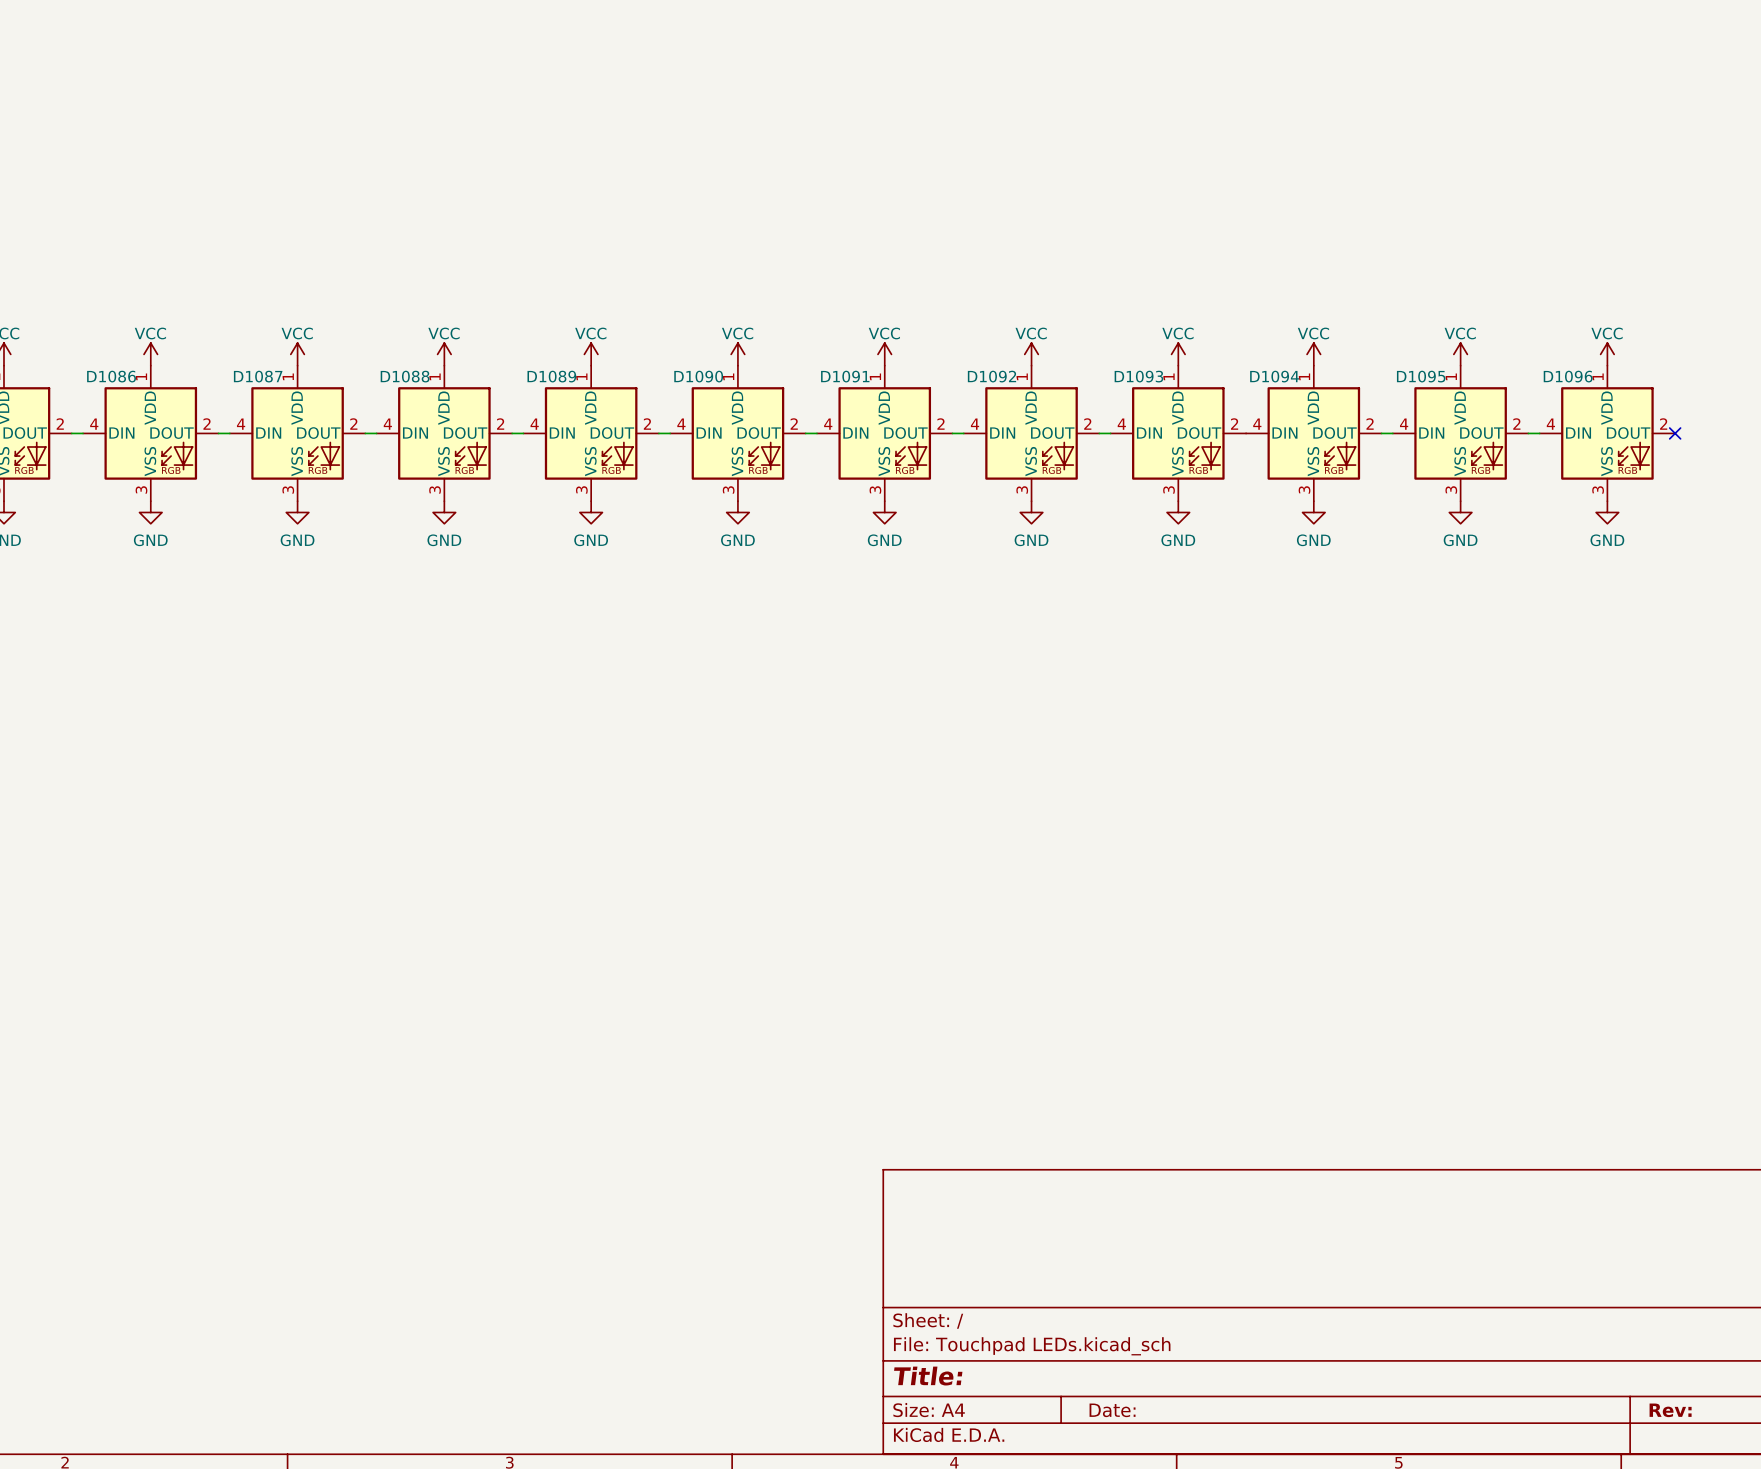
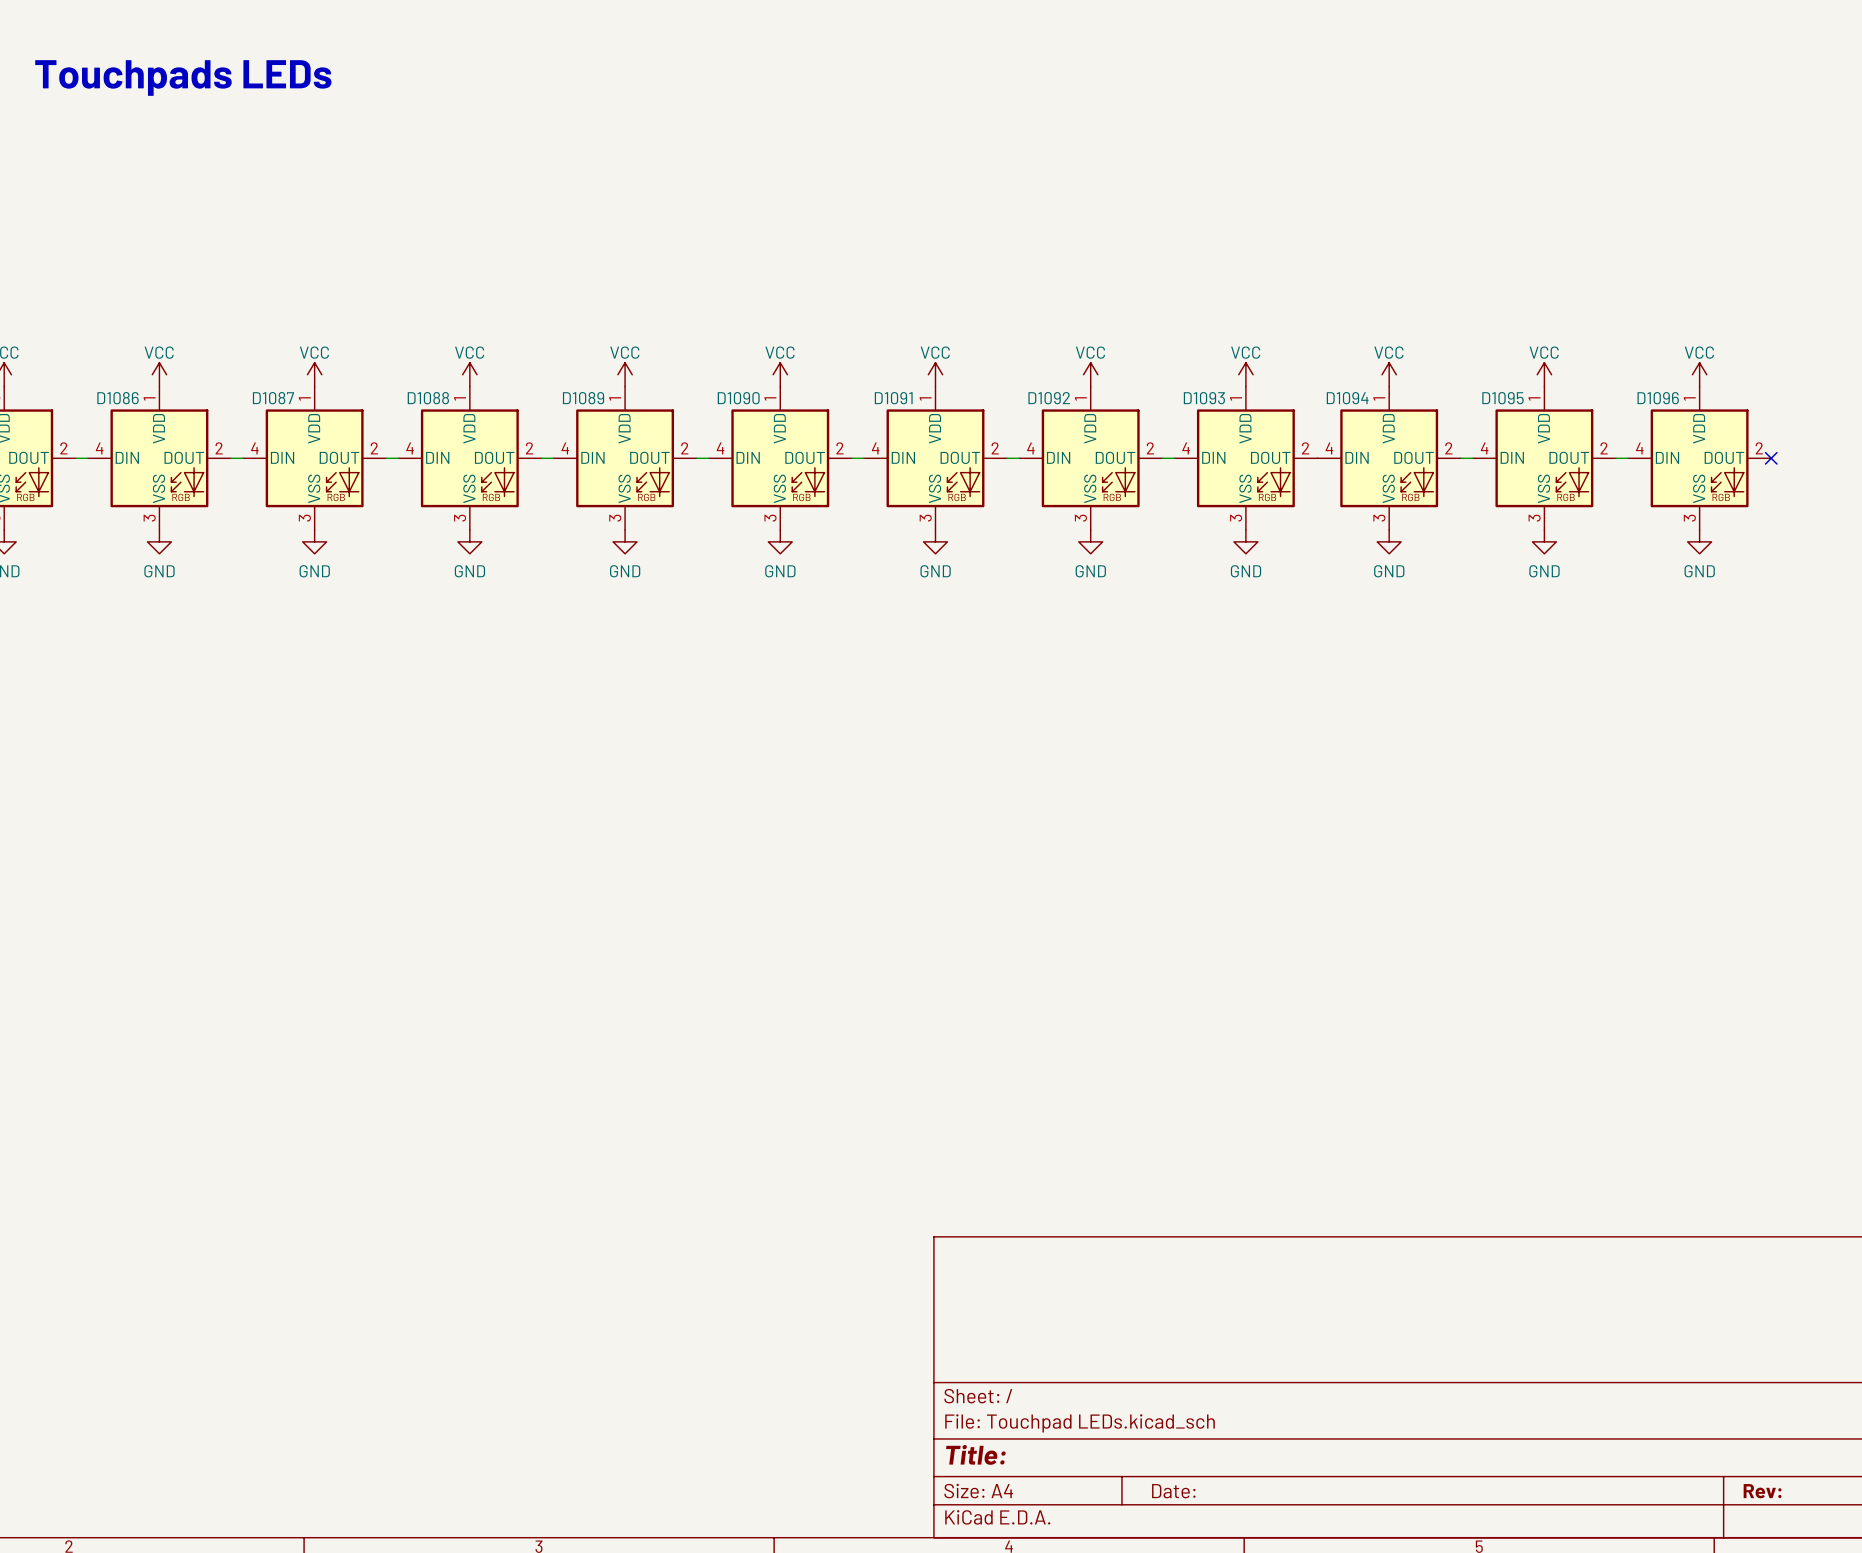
text: none -> Touchpads LEDs (183, 78)

